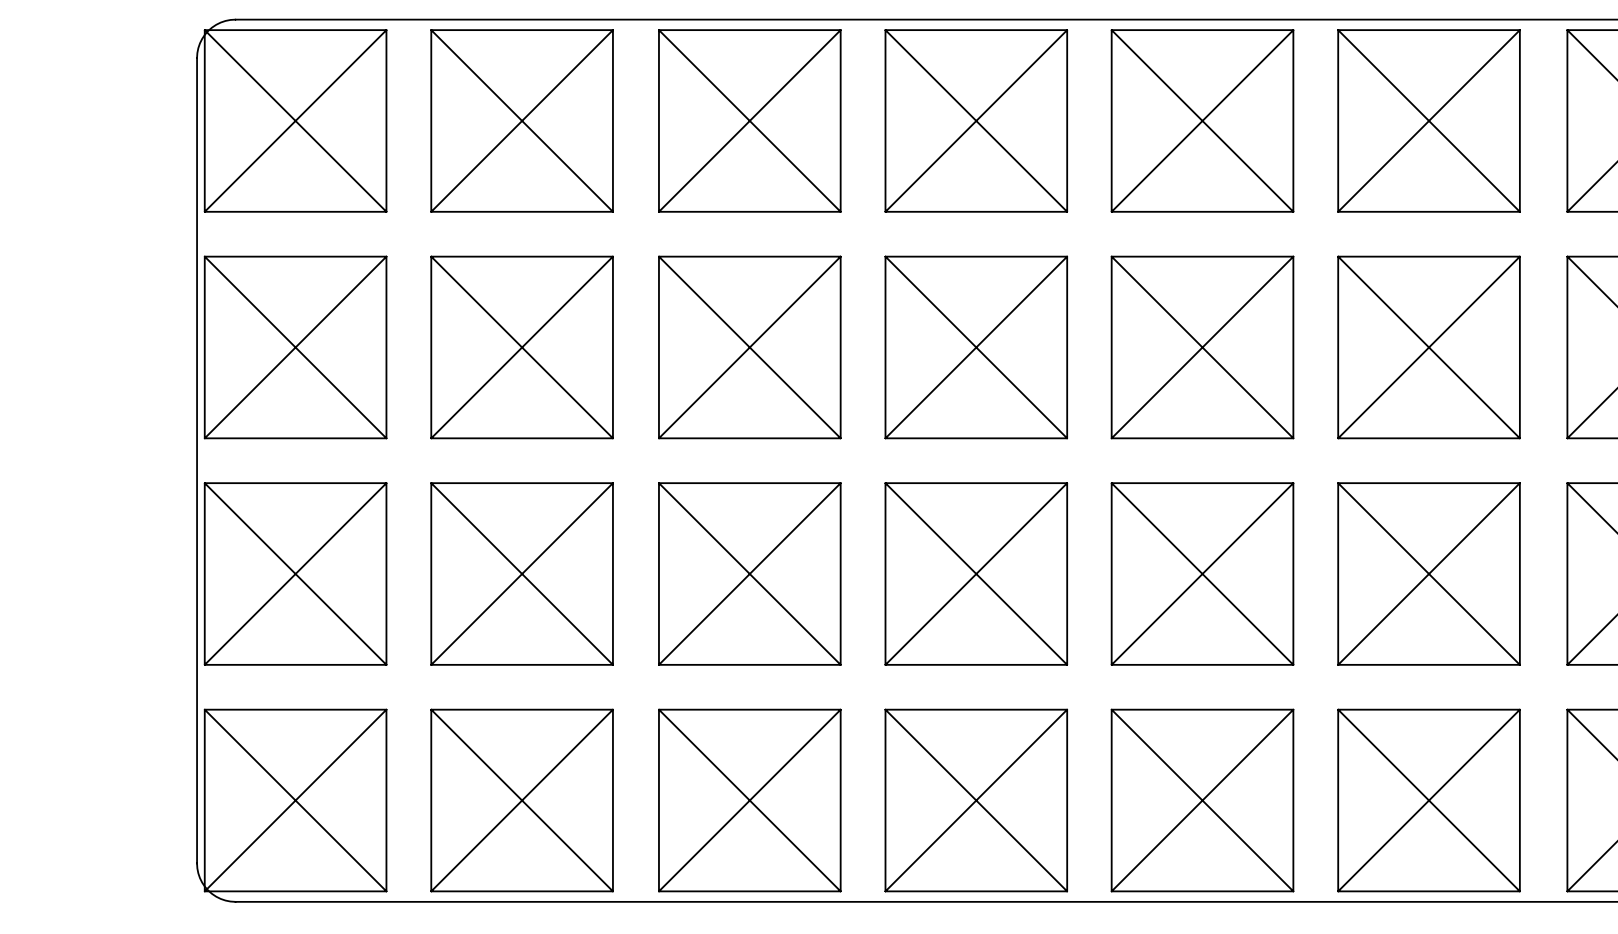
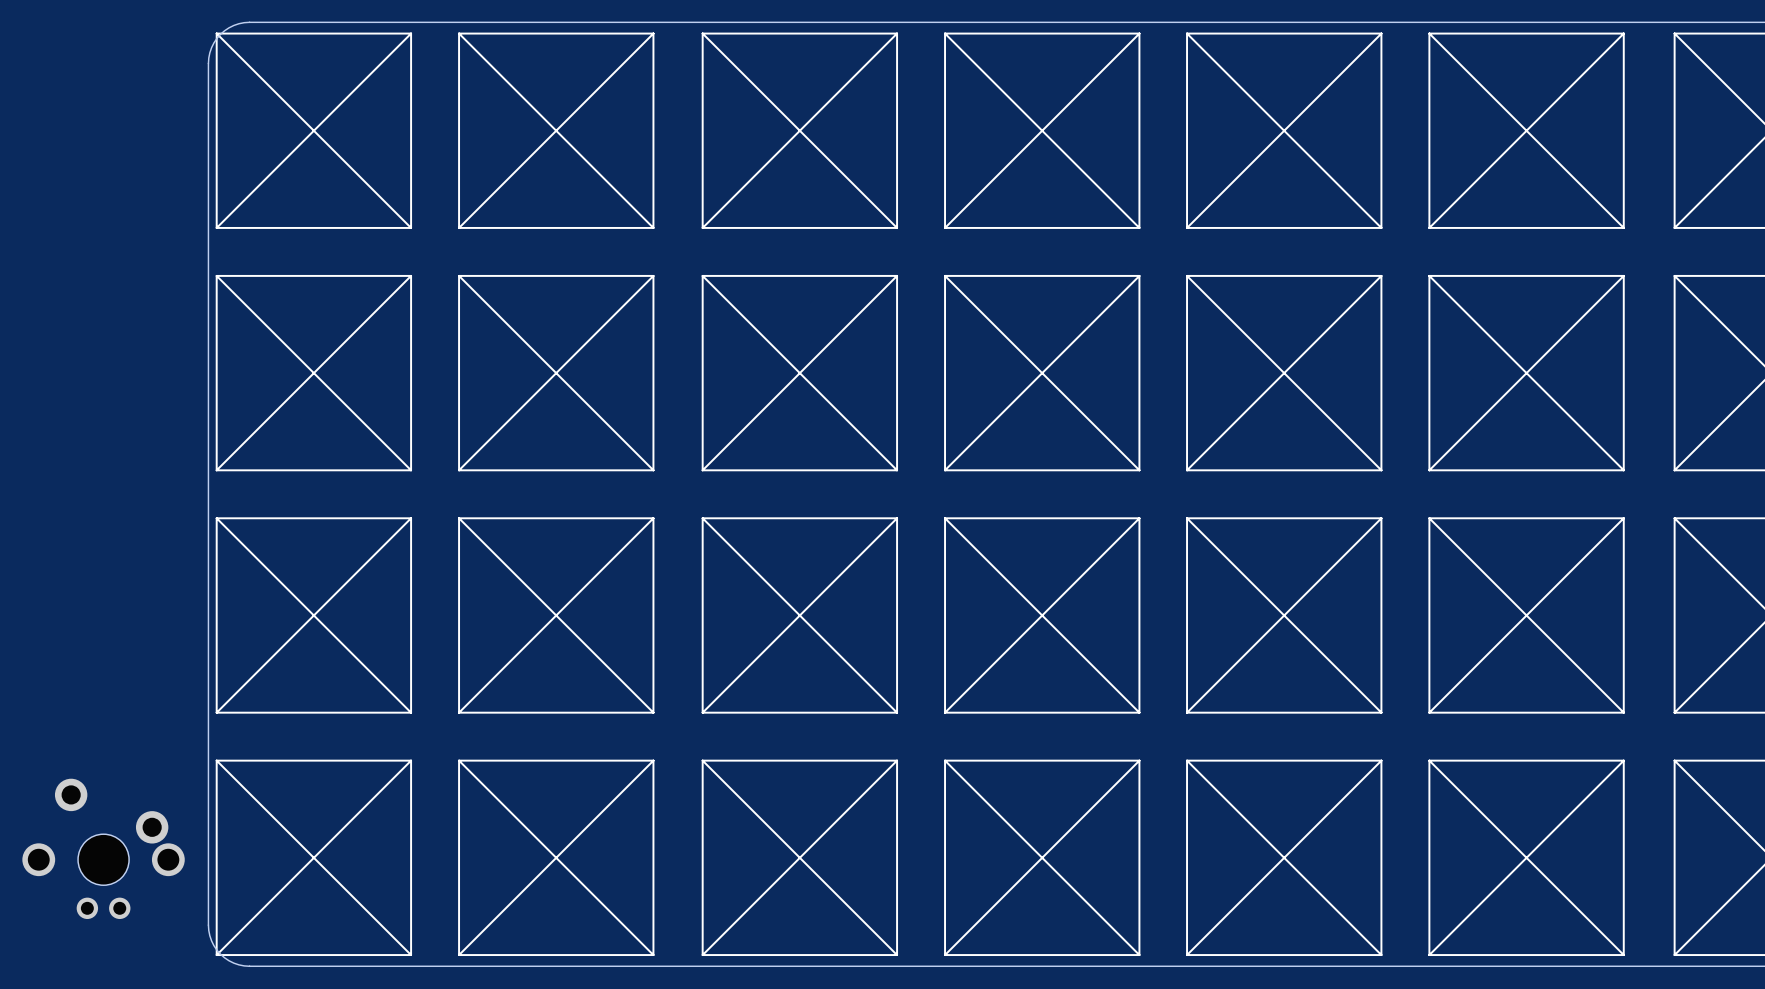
part: none -> (103, 848)

